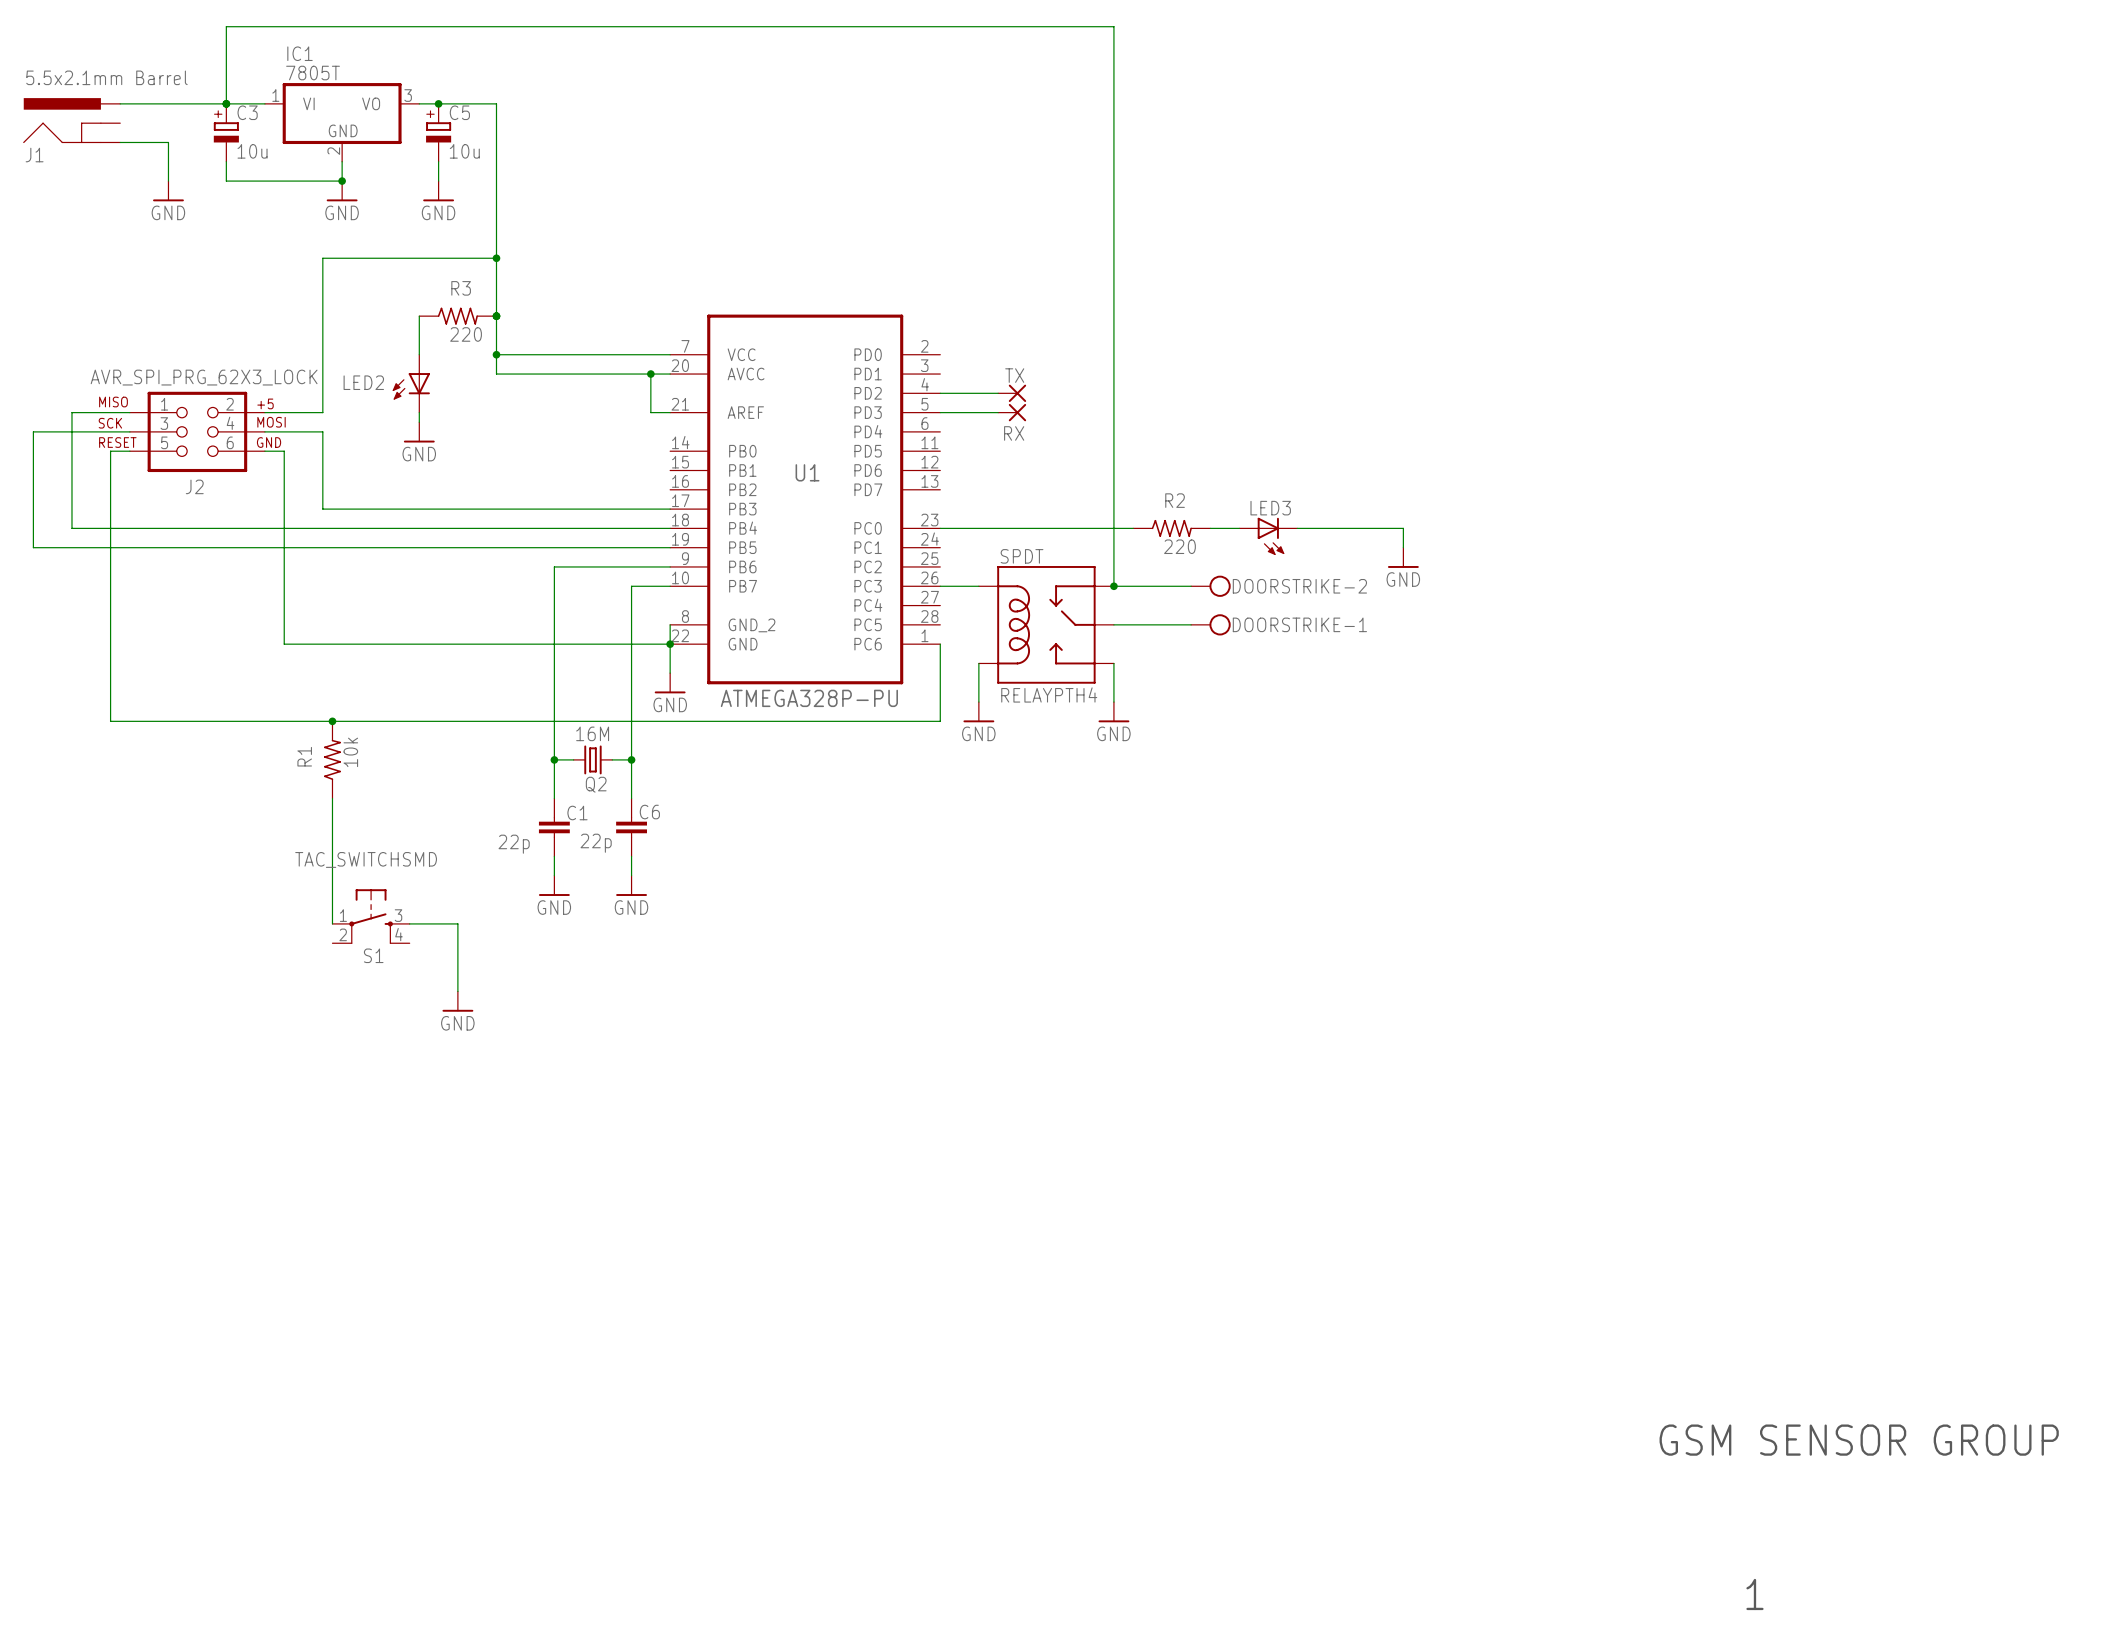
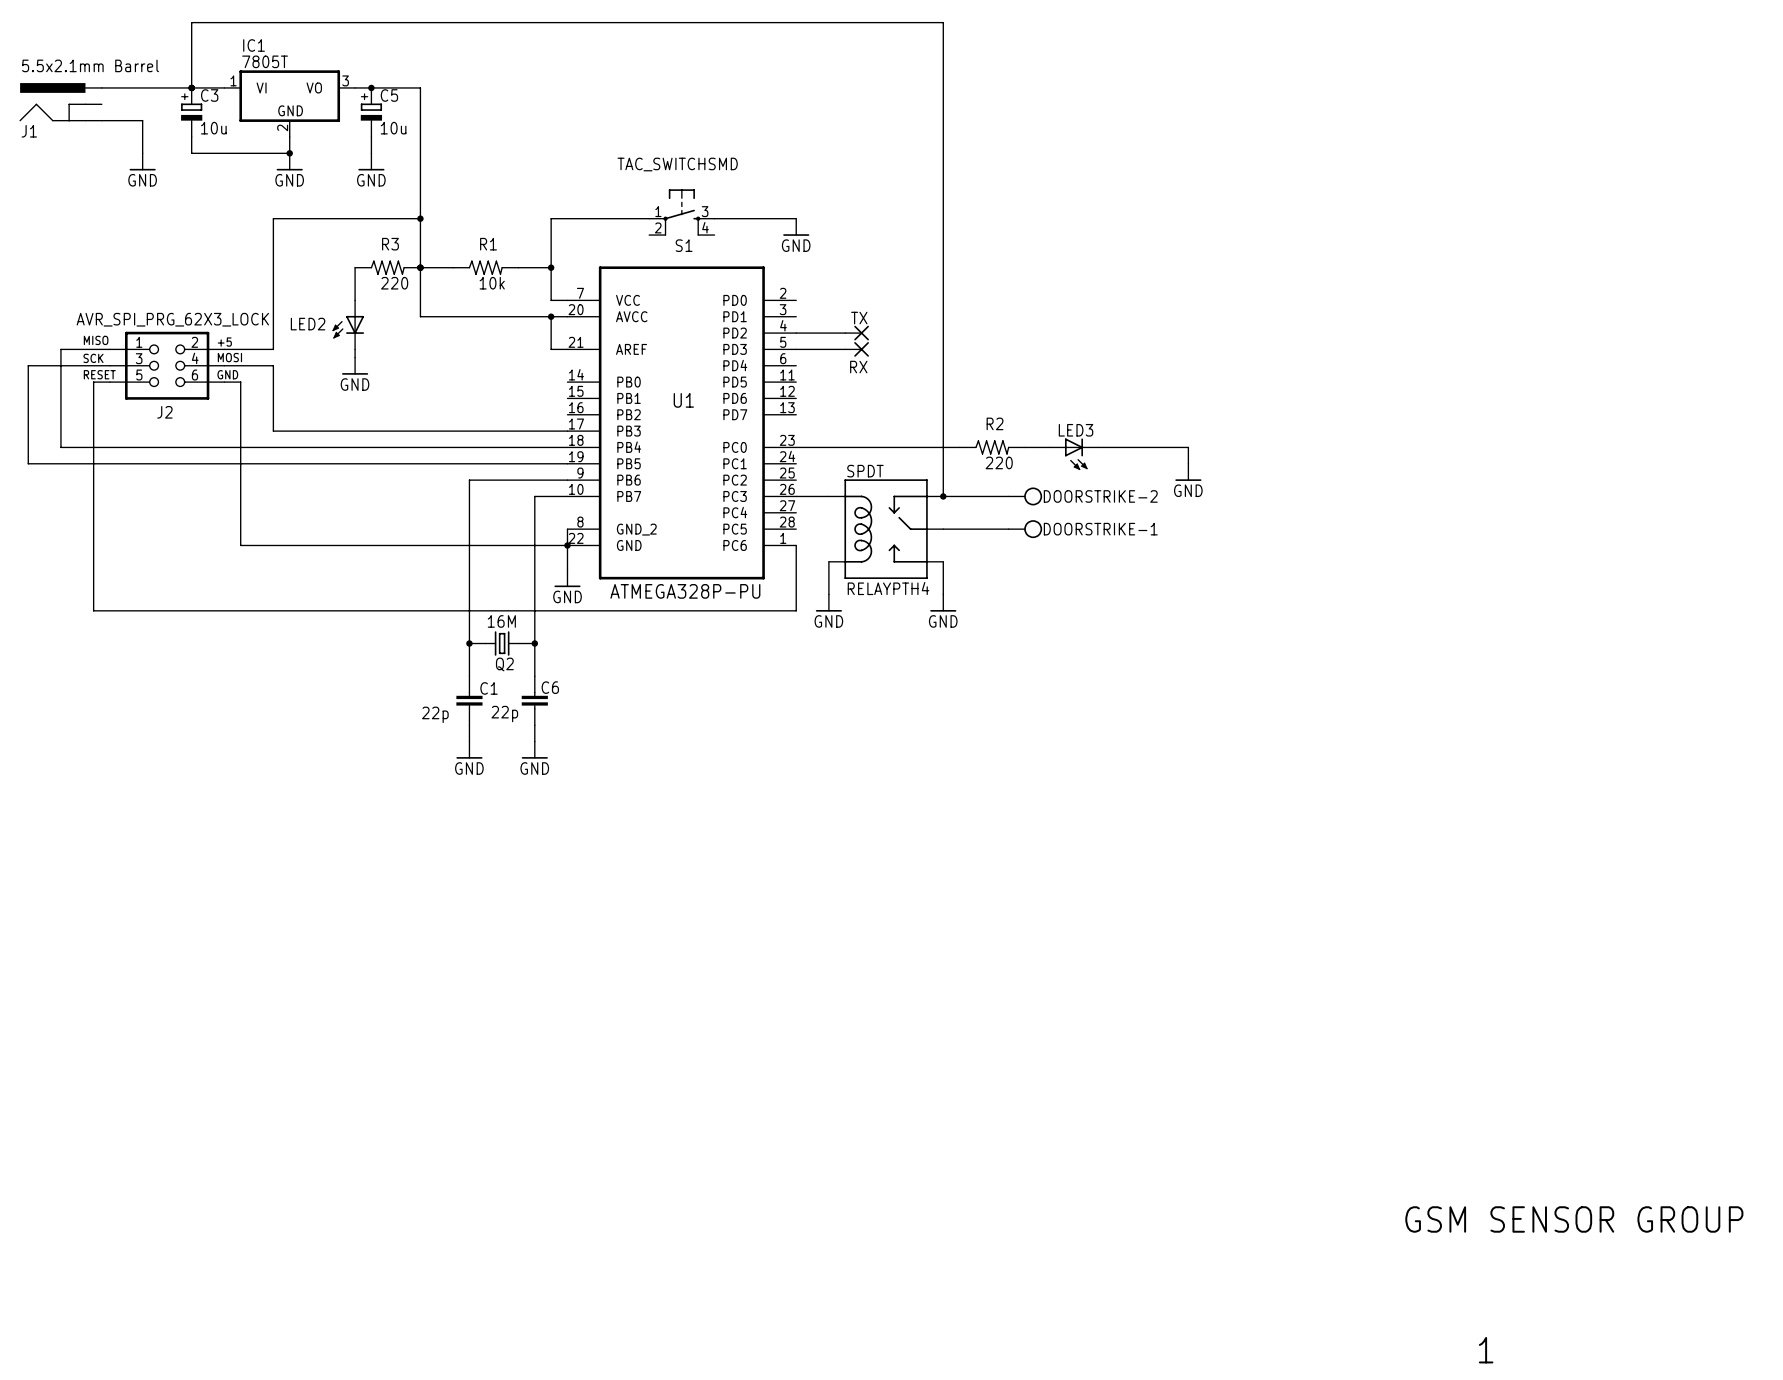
wire: none -> (714, 218) (796, 218)
power symbol: none -> GND (796, 227)
wire: none -> (420, 267) (453, 267)
wire: none -> (518, 267) (551, 267)
junction: none -> (551, 267)
wire: (496, 354) (650, 354) -> (649, 218) (551, 218) (551, 300)
junction: (496, 354) -> none
junction: (332, 721) -> none
R1 rotation: 0° (332, 759) -> 90° clockwise (485, 267)
R1 position: (332, 759) -> (485, 267)
wire: (332, 798) (332, 923) -> none
S1 position: (371, 916) -> (681, 212)
wire: (409, 923) (457, 923) (457, 991) -> none
power symbol: GND (457, 1001) -> none

